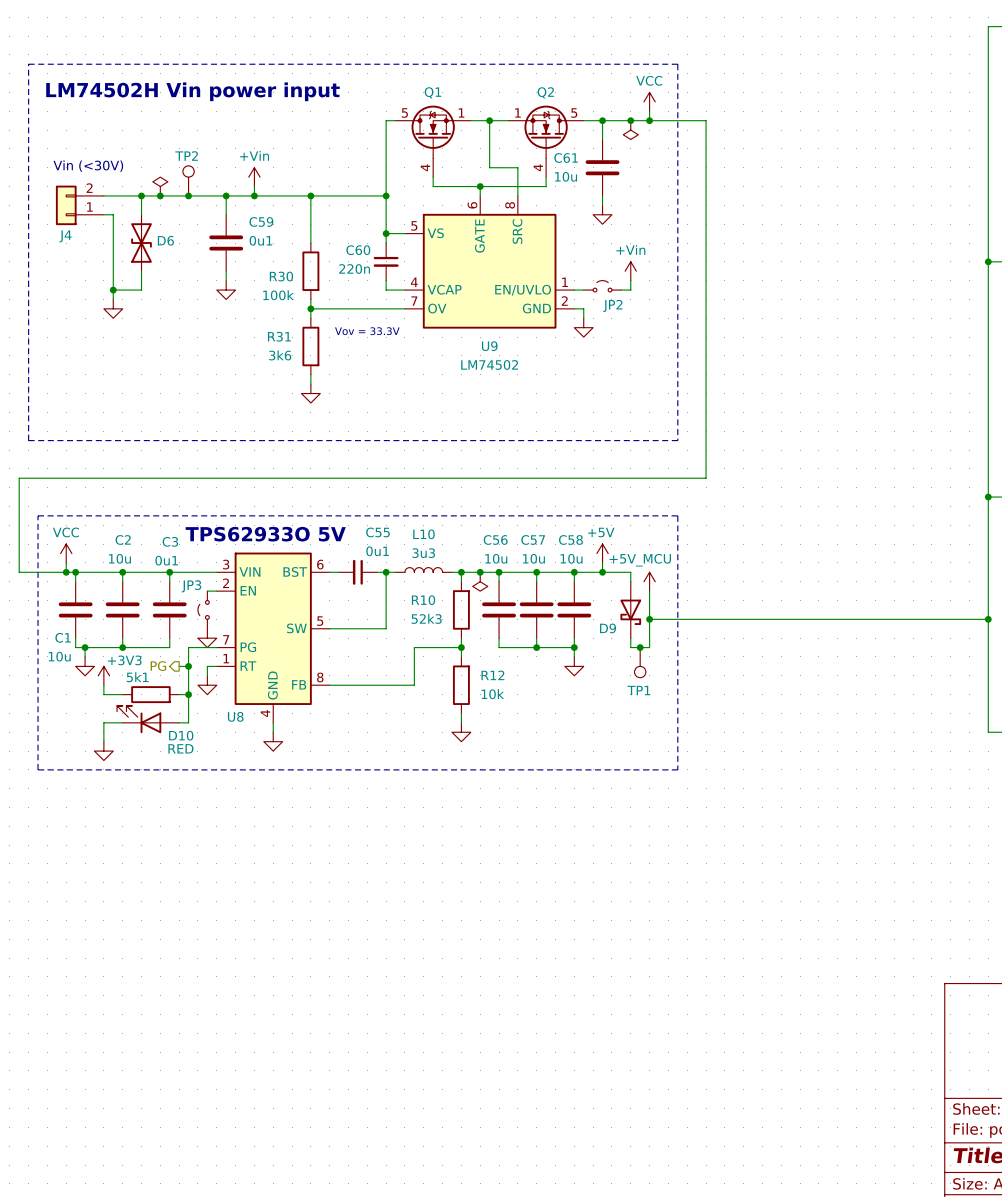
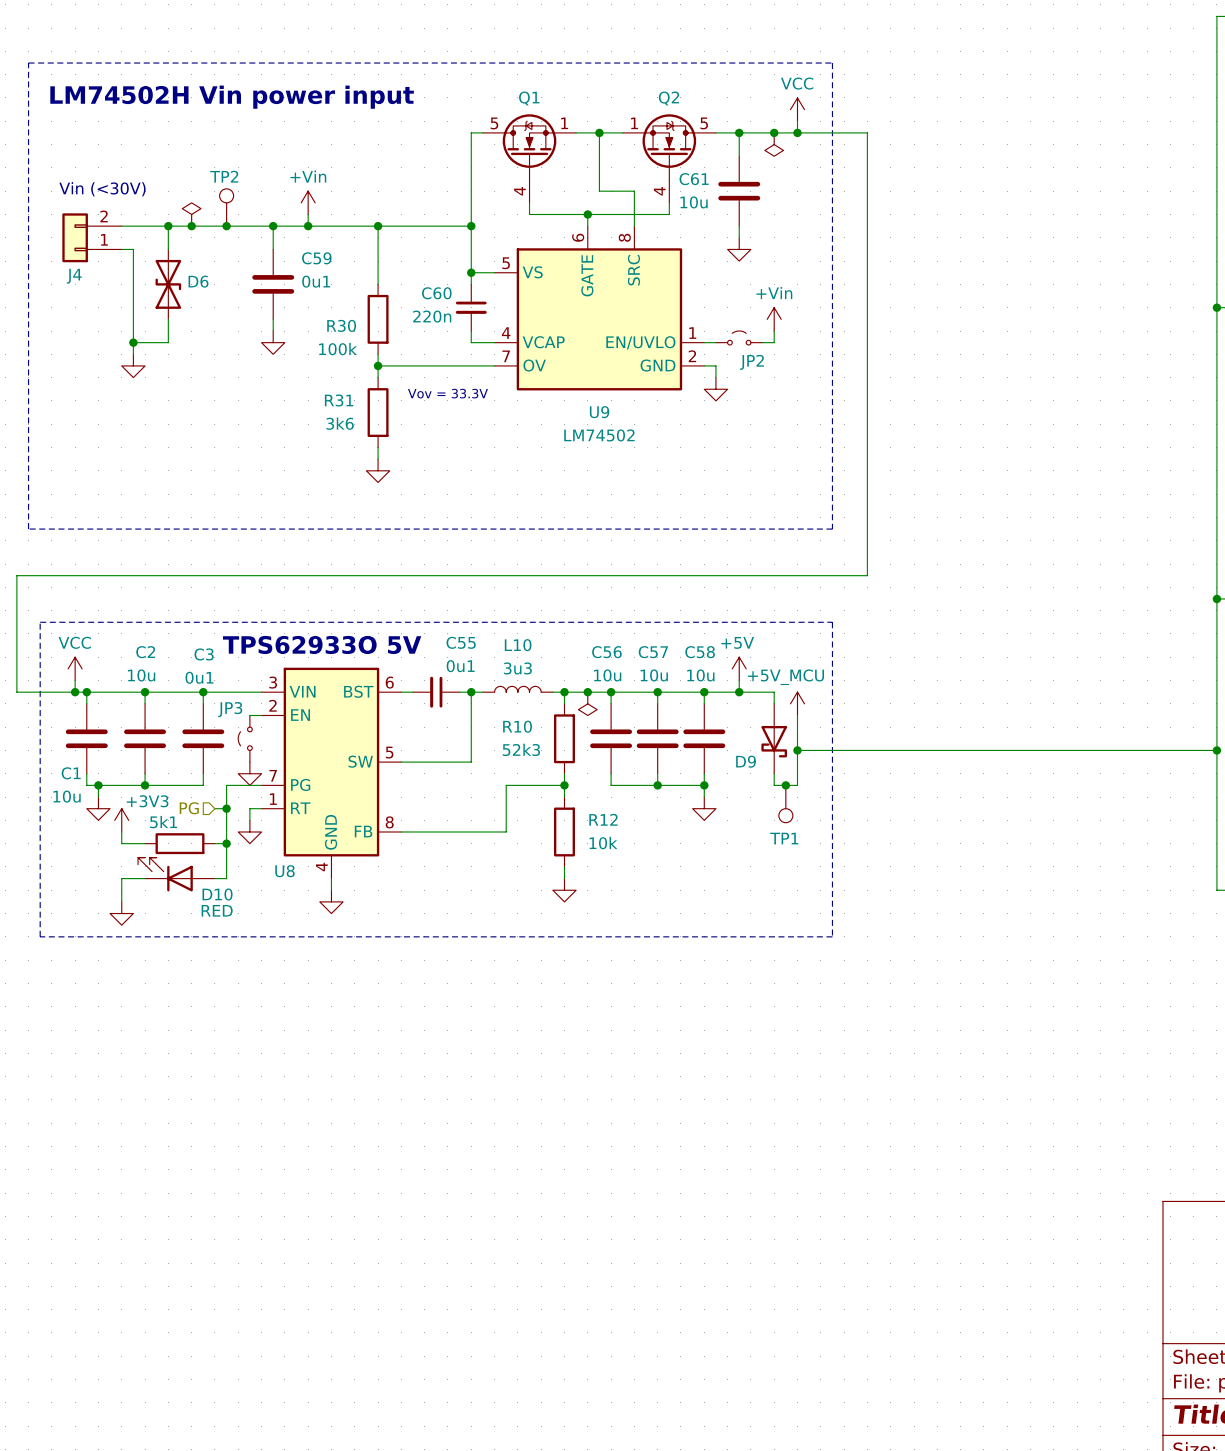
hierarchical label shape: output (158, 666) -> input (189, 808)

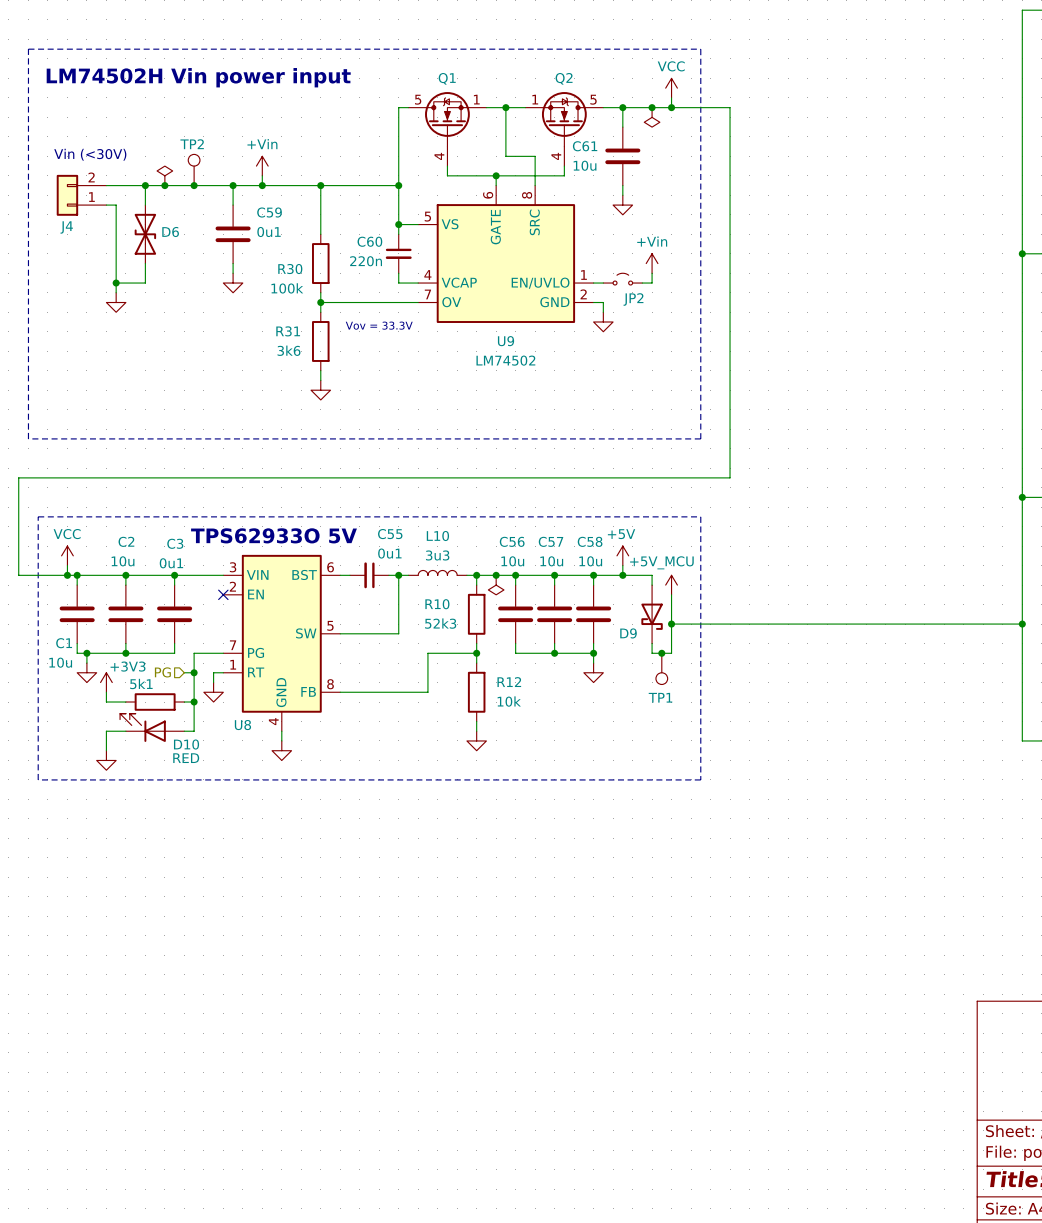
wire: (249, 715) (261, 715) -> none
no-connect mark: none -> (223, 594)
JP3: (245, 738) -> none
power symbol: (249, 773) -> none

